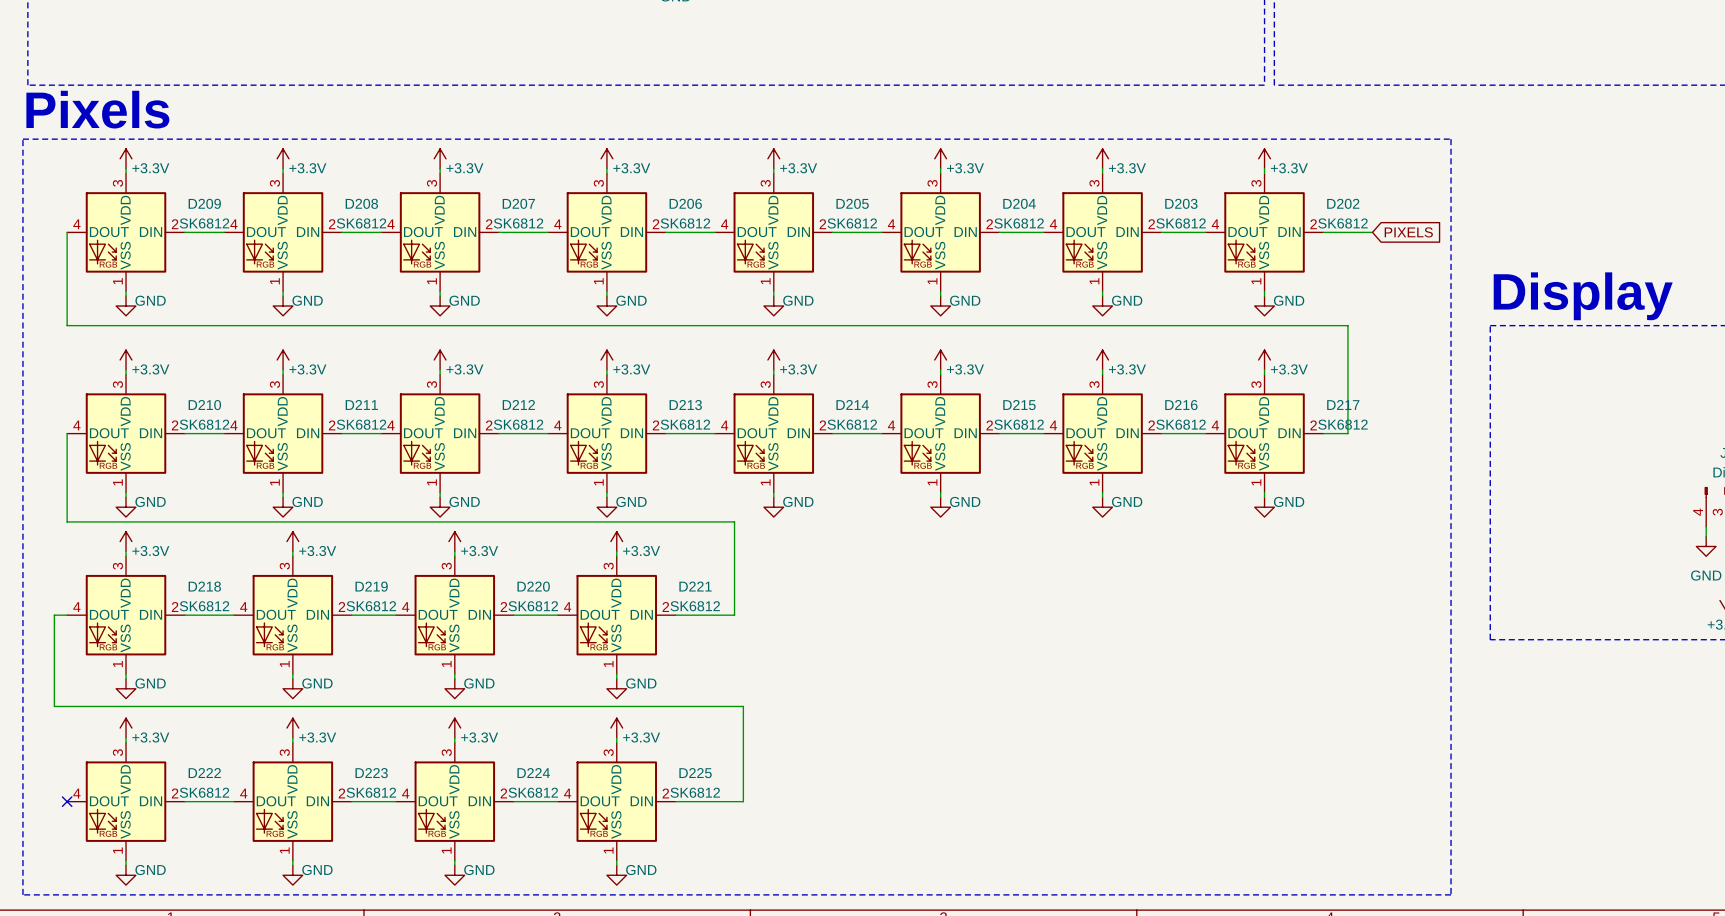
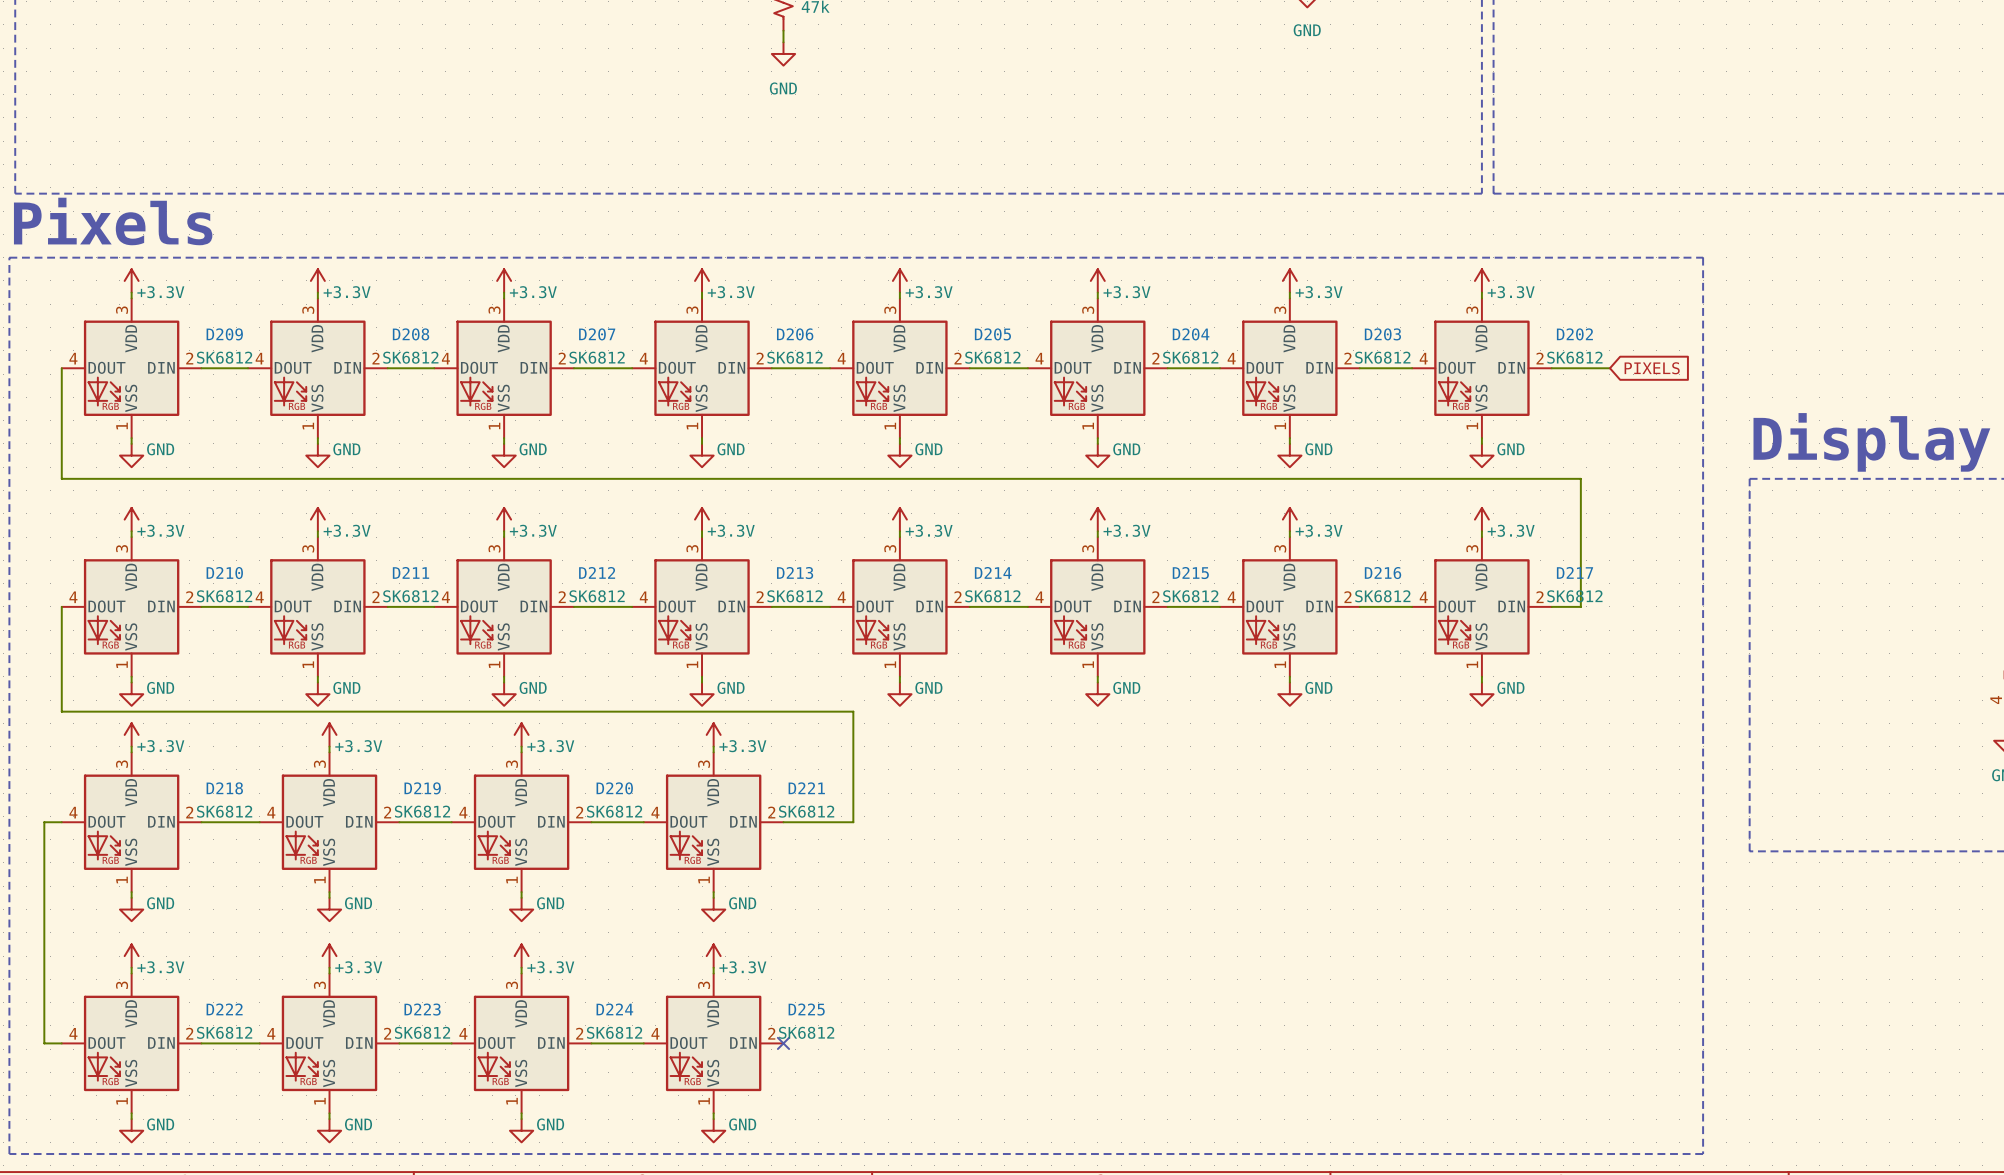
wire: (54, 615) (54, 706) (743, 706) (743, 801) (675, 801) -> (46, 822) (44, 822) (44, 1043) (61, 1043)
no-connect mark: (67, 801) -> none
no-connect mark: none -> (783, 1043)

